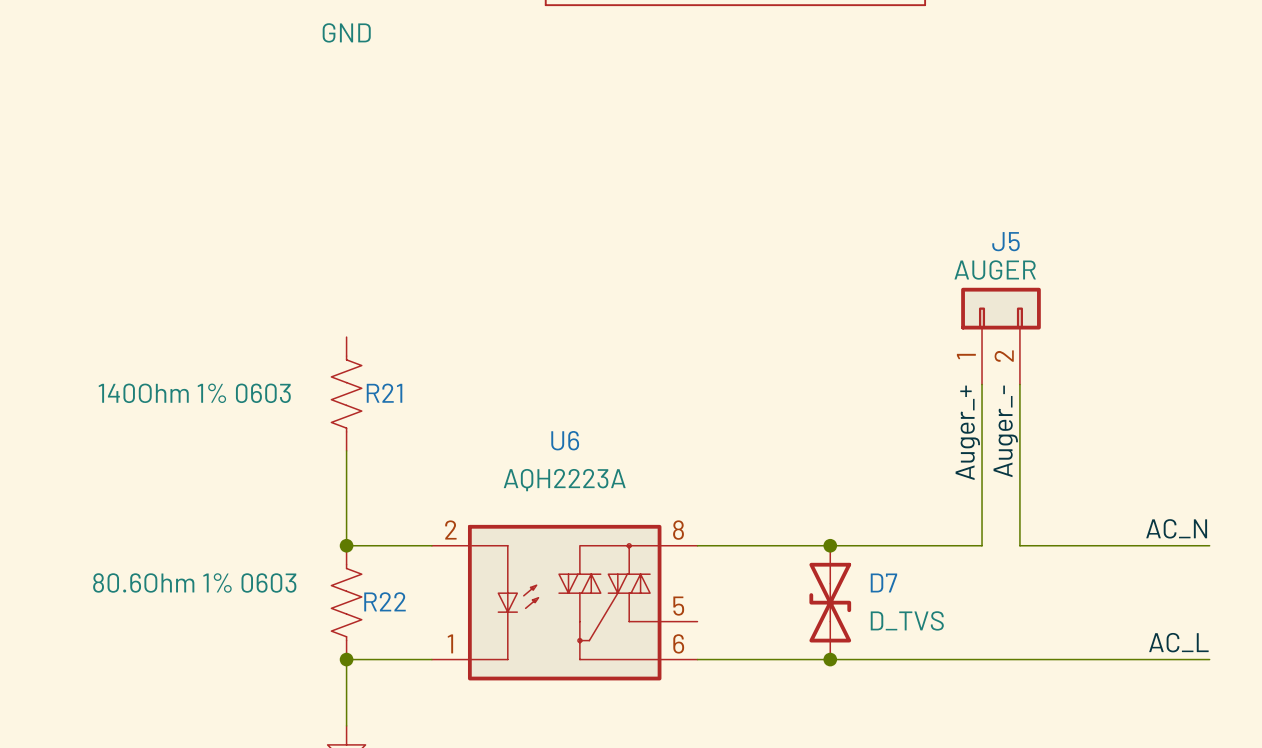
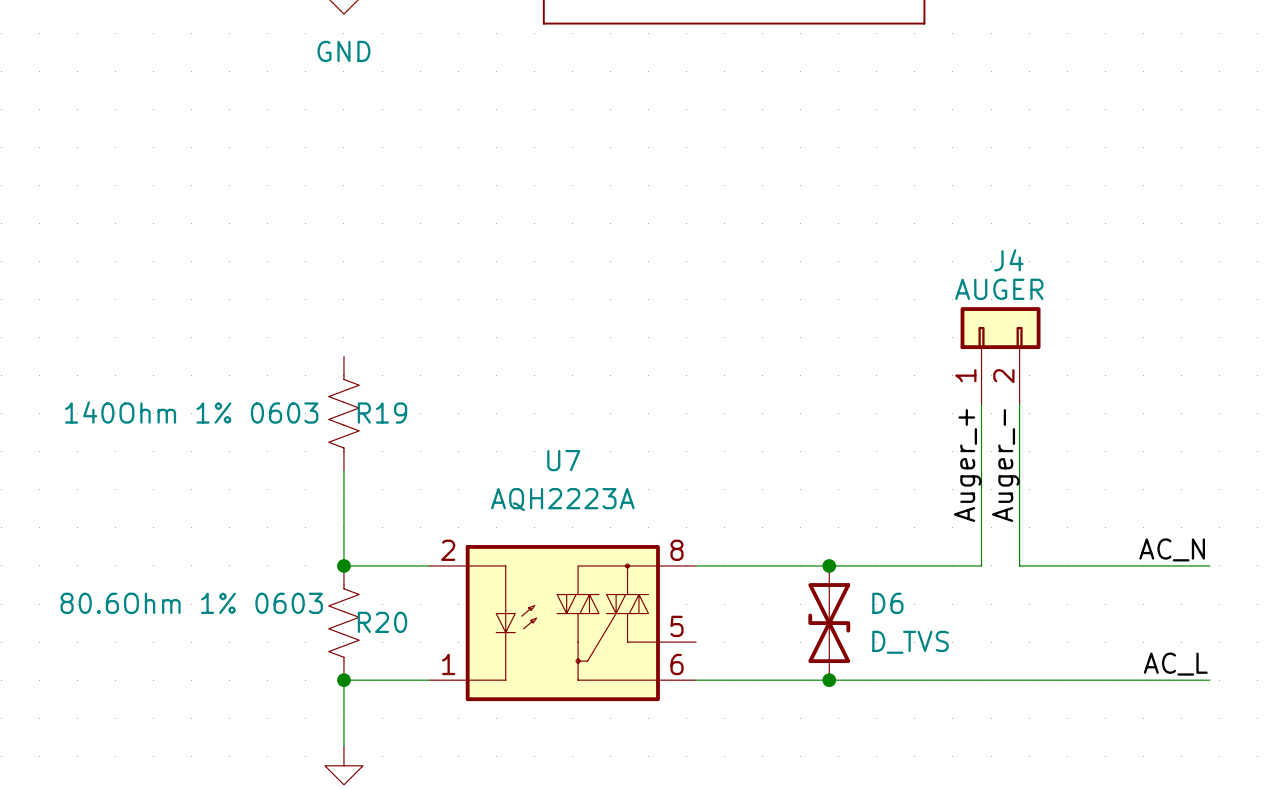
J5 name: J5 (1005, 241) -> J4 (1008, 260)
R21 name: R21 (384, 393) -> R19 (382, 413)
U6 name: U6 (565, 440) -> U7 (563, 460)
D7 name: D7 (883, 582) -> D6 (887, 603)
R22 name: R22 (385, 601) -> R20 (382, 622)

